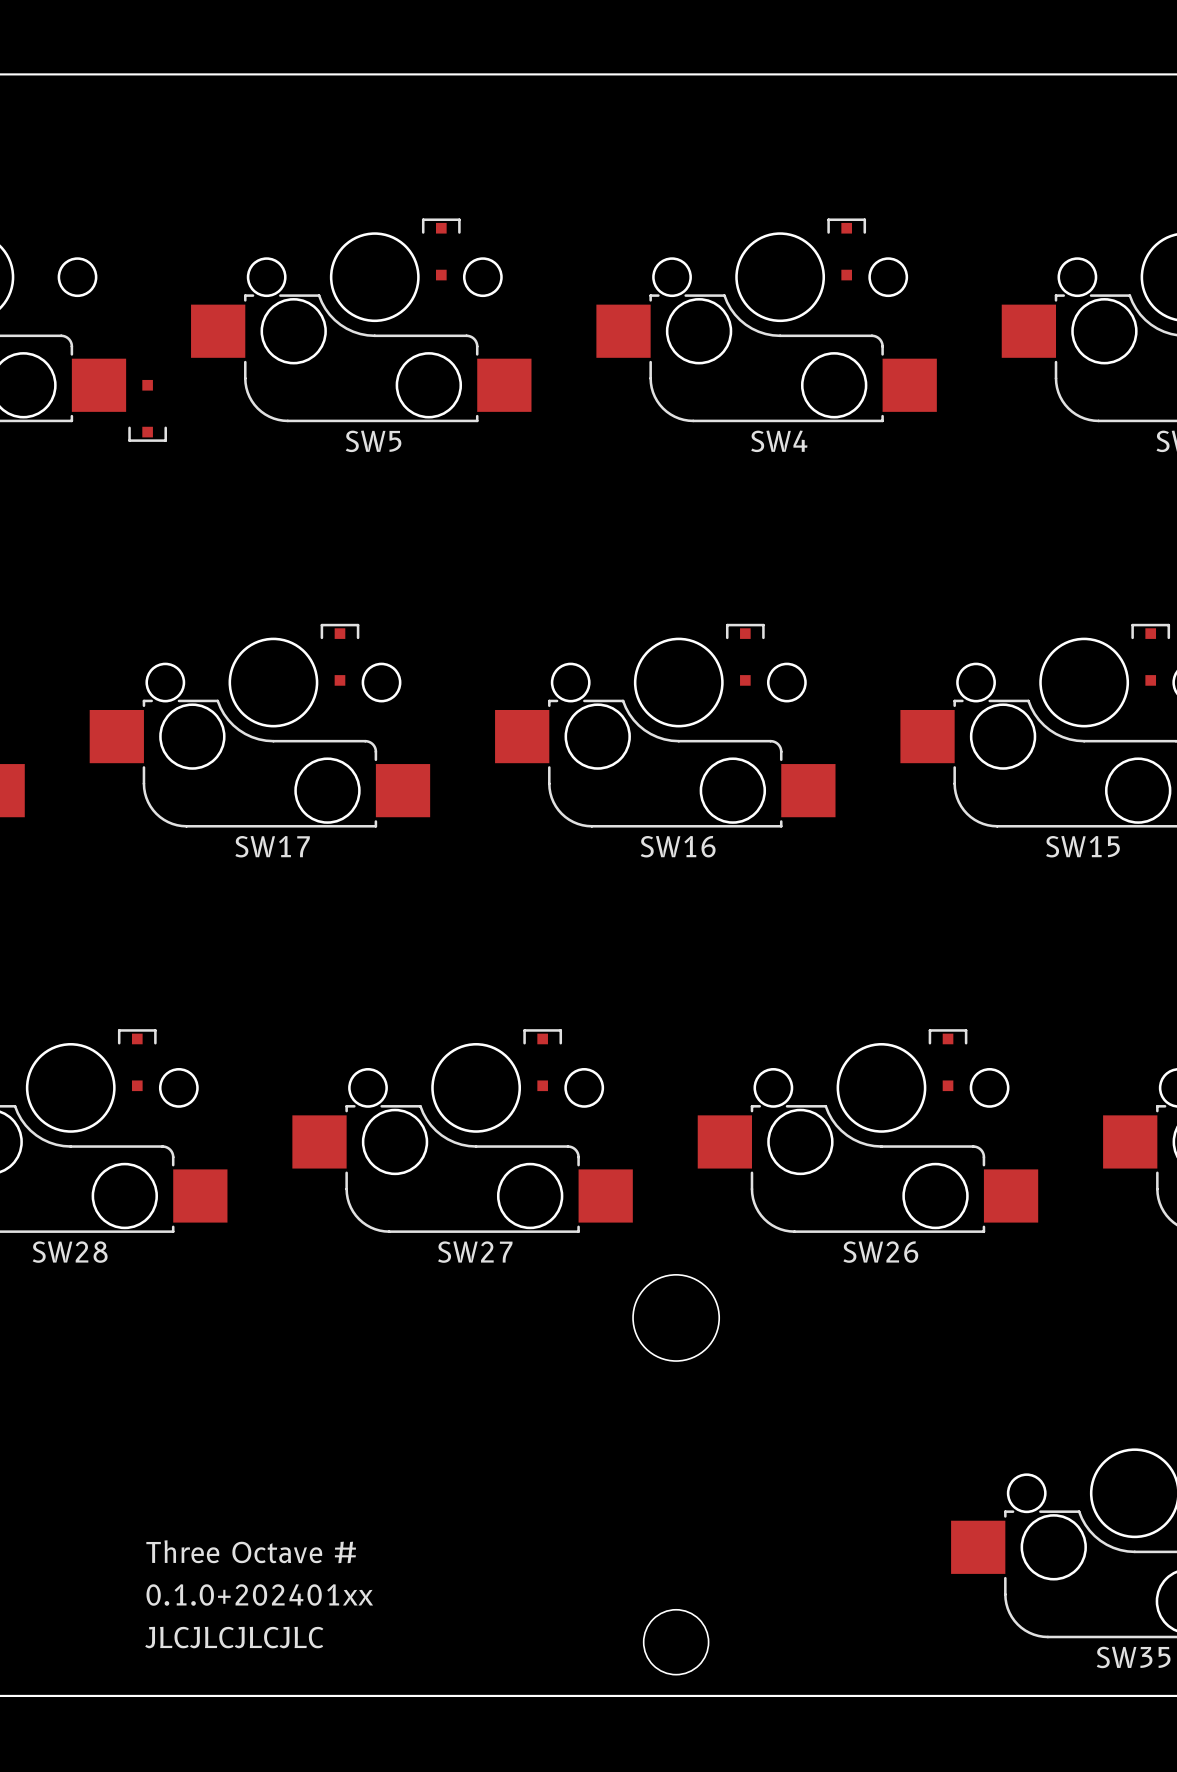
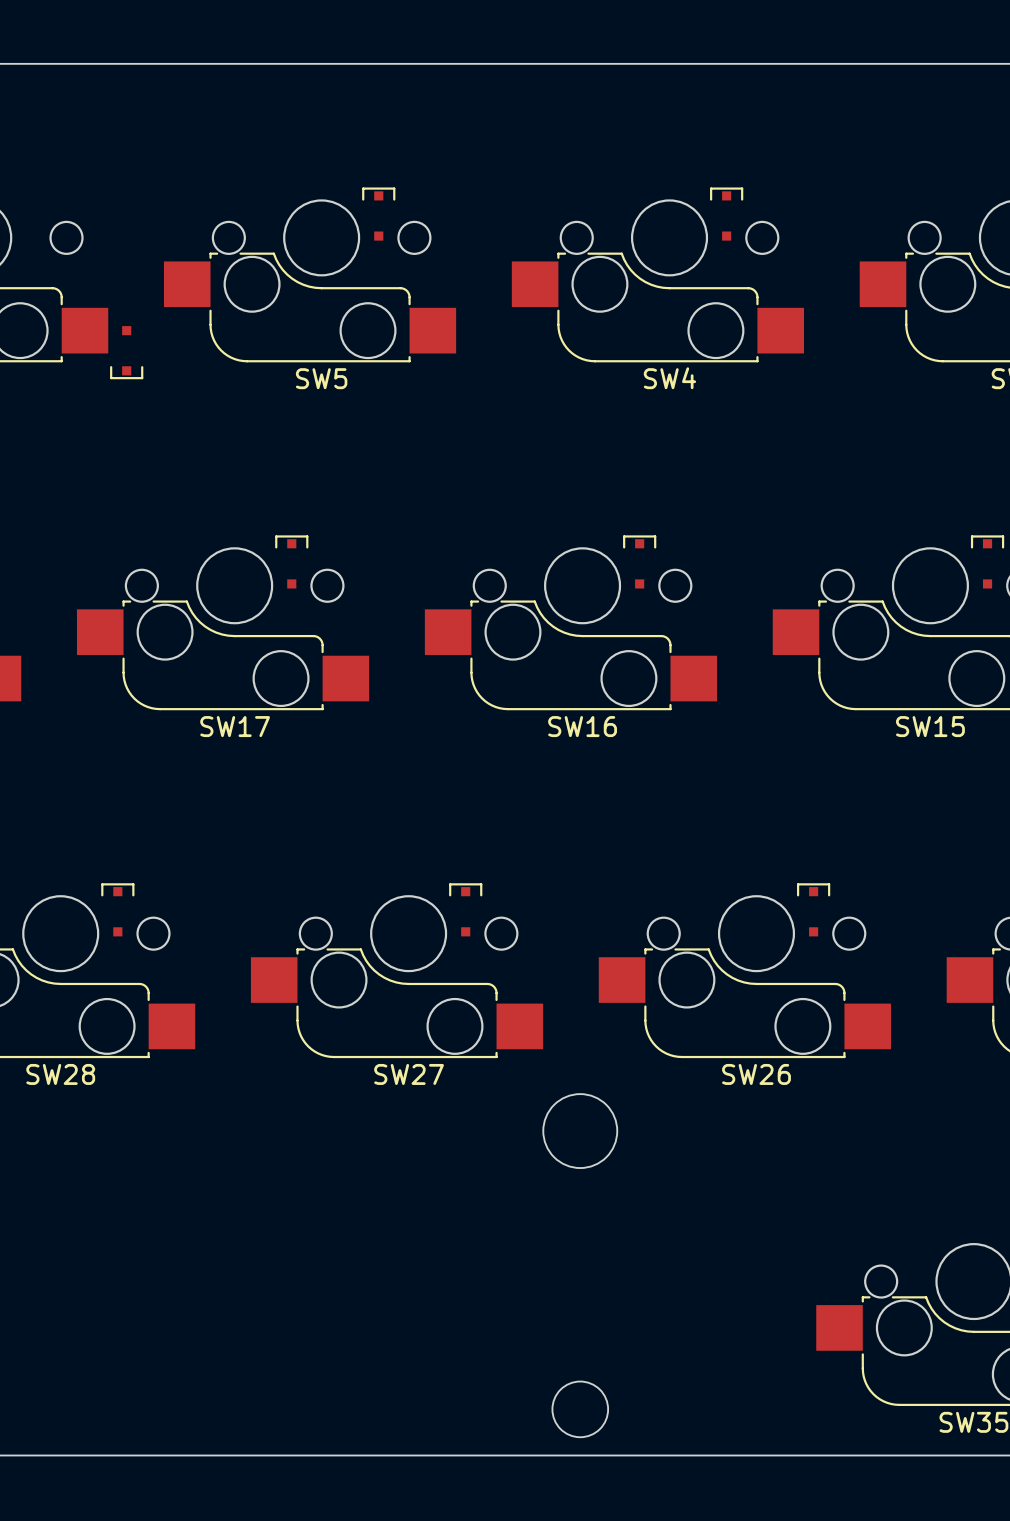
text: Three Octave # (251, 1551) -> none
text: 0.1.0+202401xx (259, 1594) -> none
text: JLCJLCJLCJLC (234, 1637) -> none

